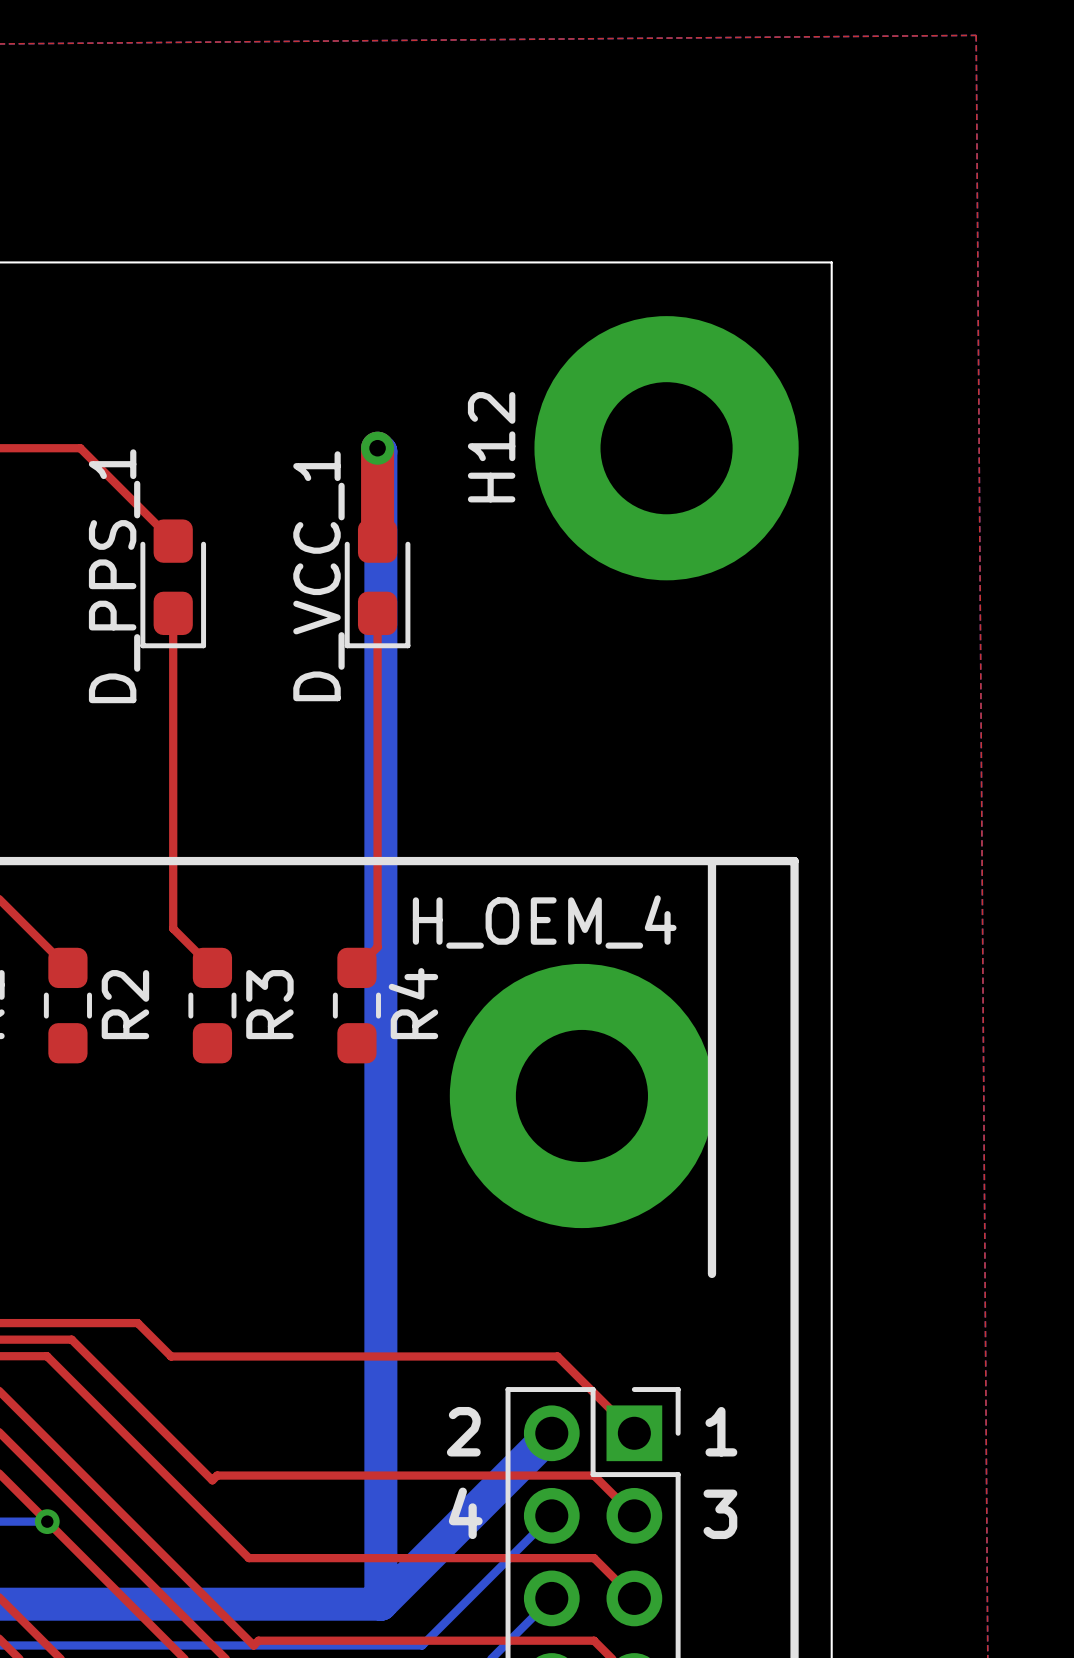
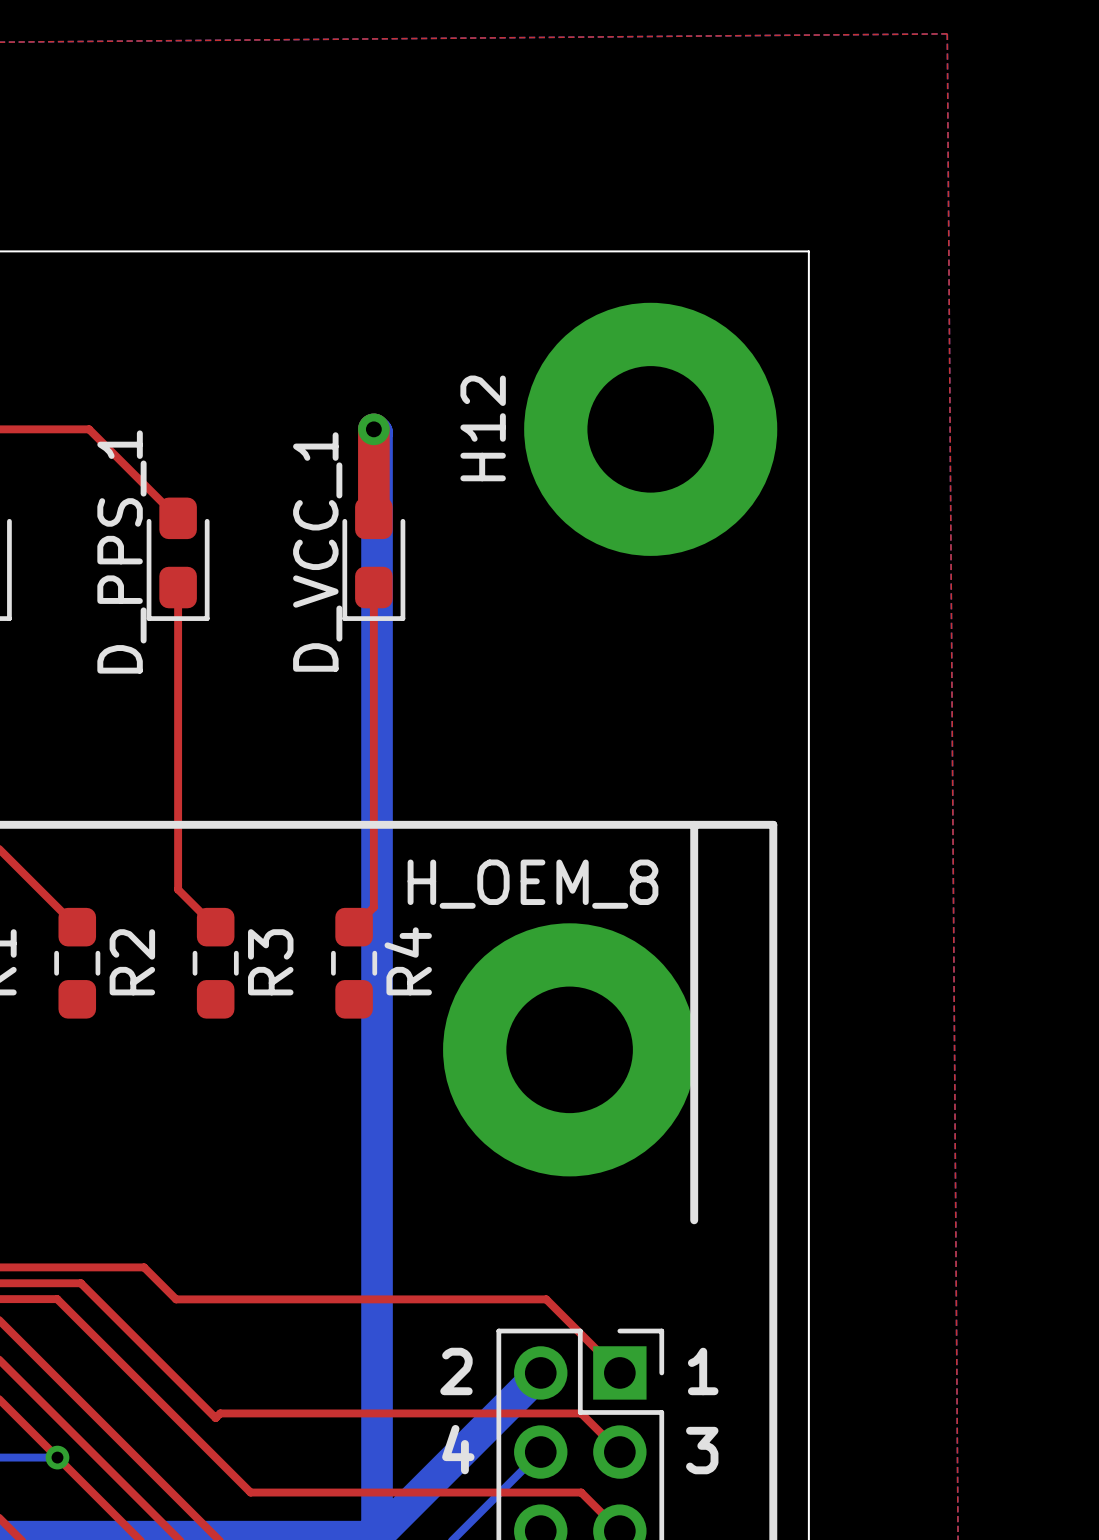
H_OEM_4 name: H_OEM_4 (544, 922) -> H_OEM_8 (532, 884)

